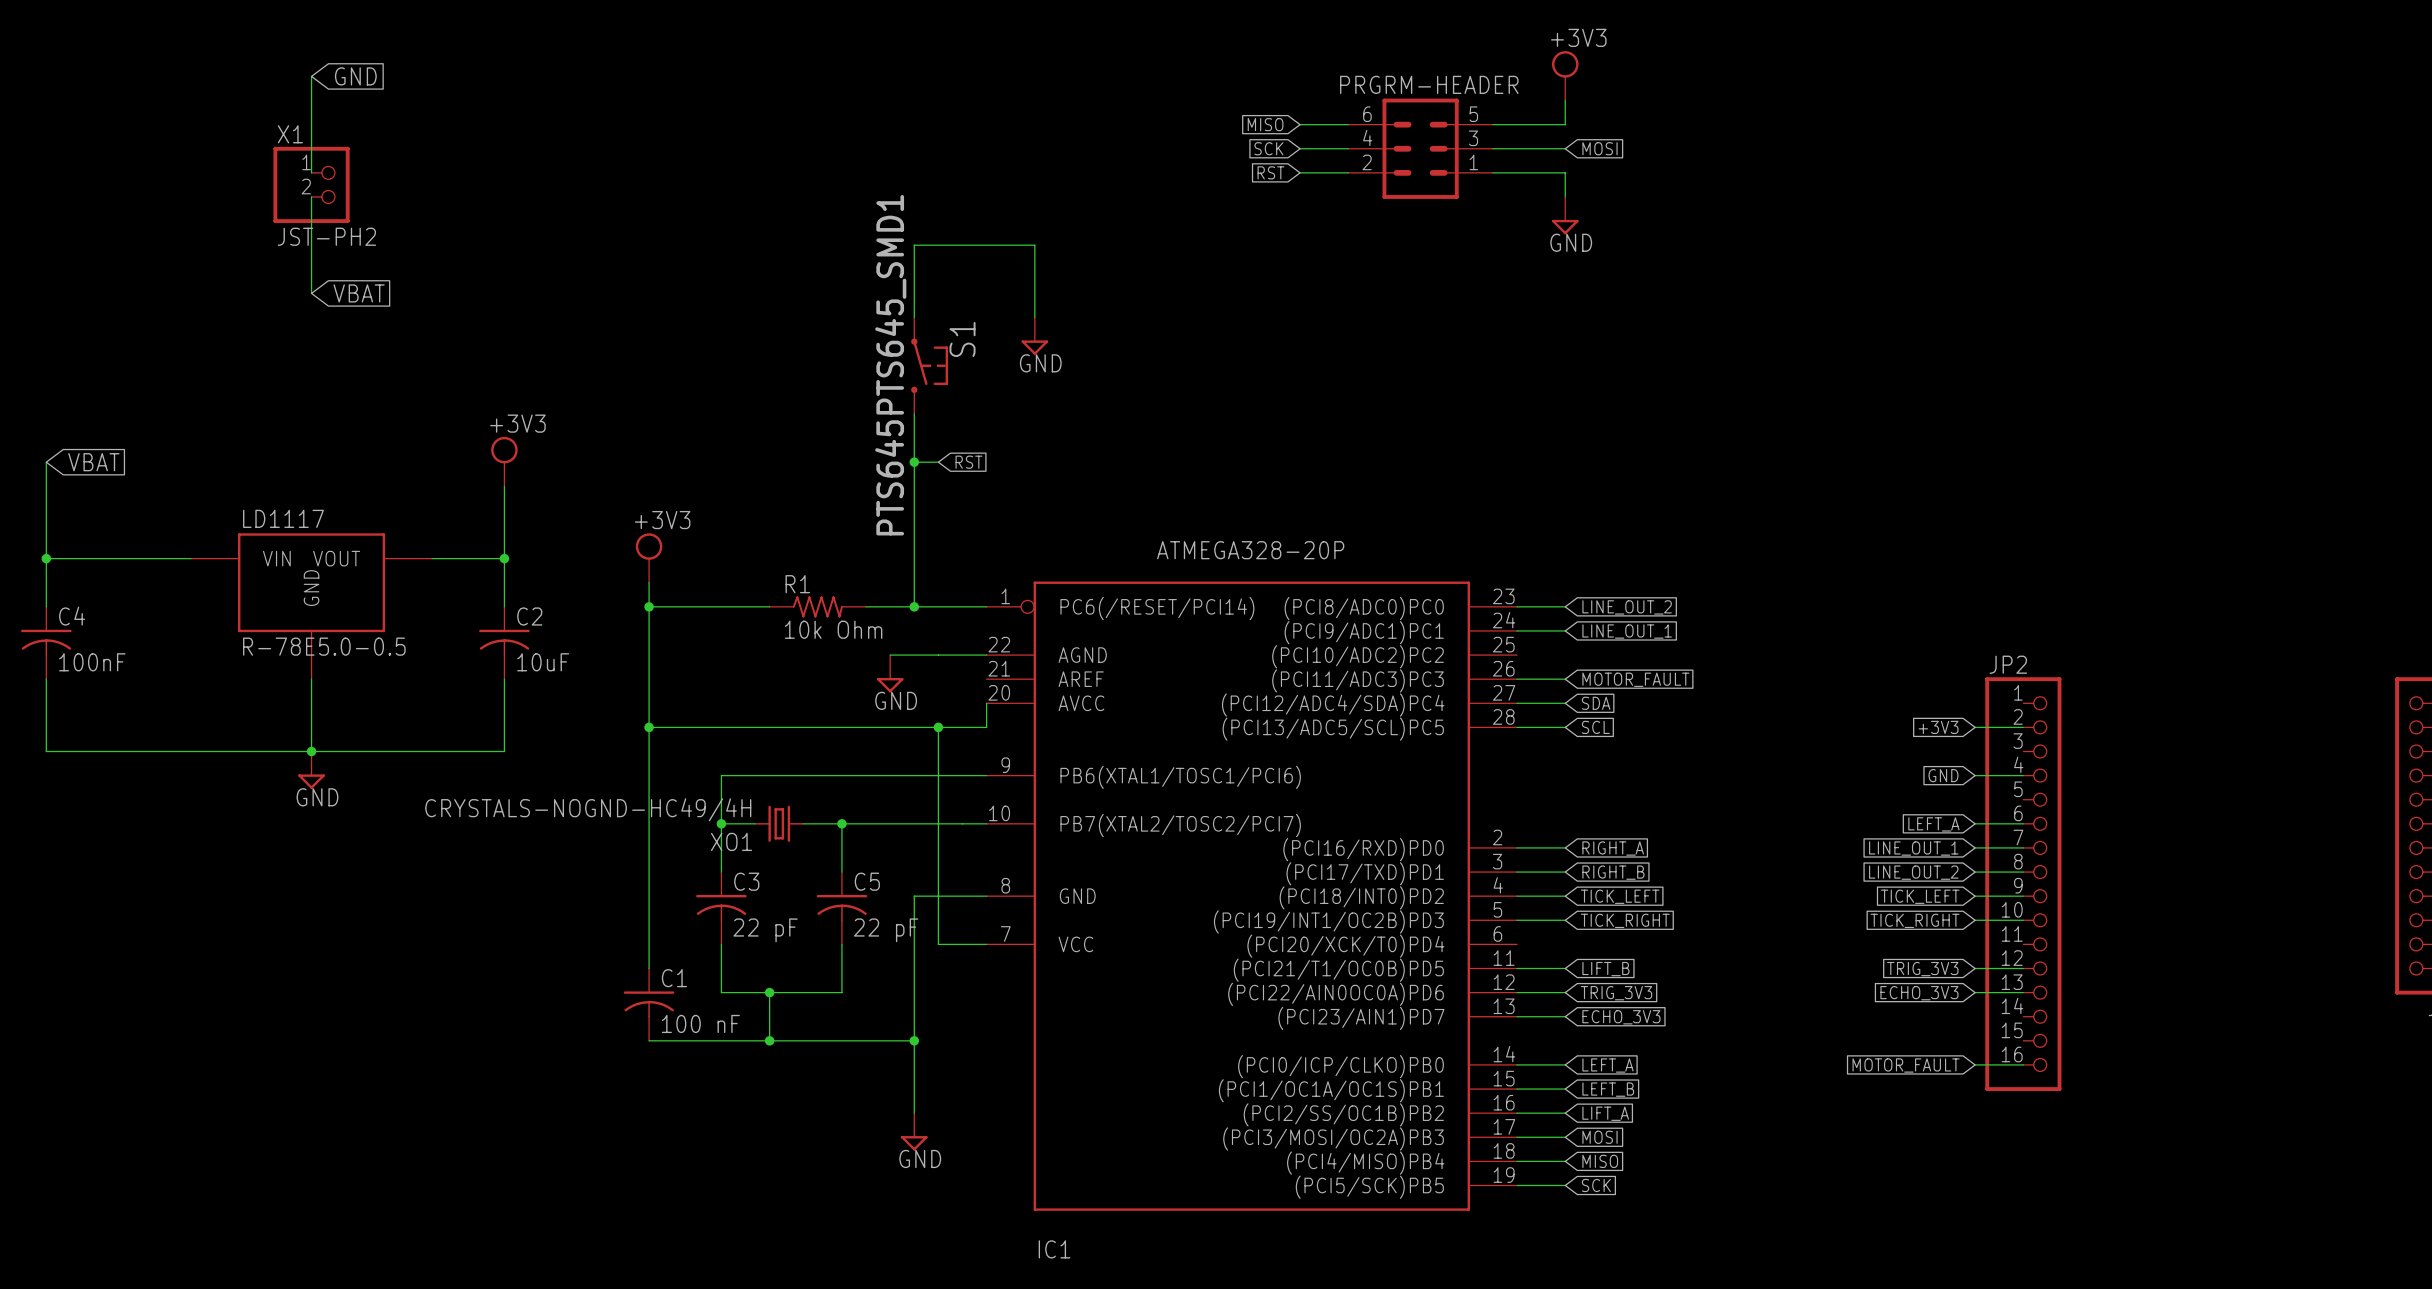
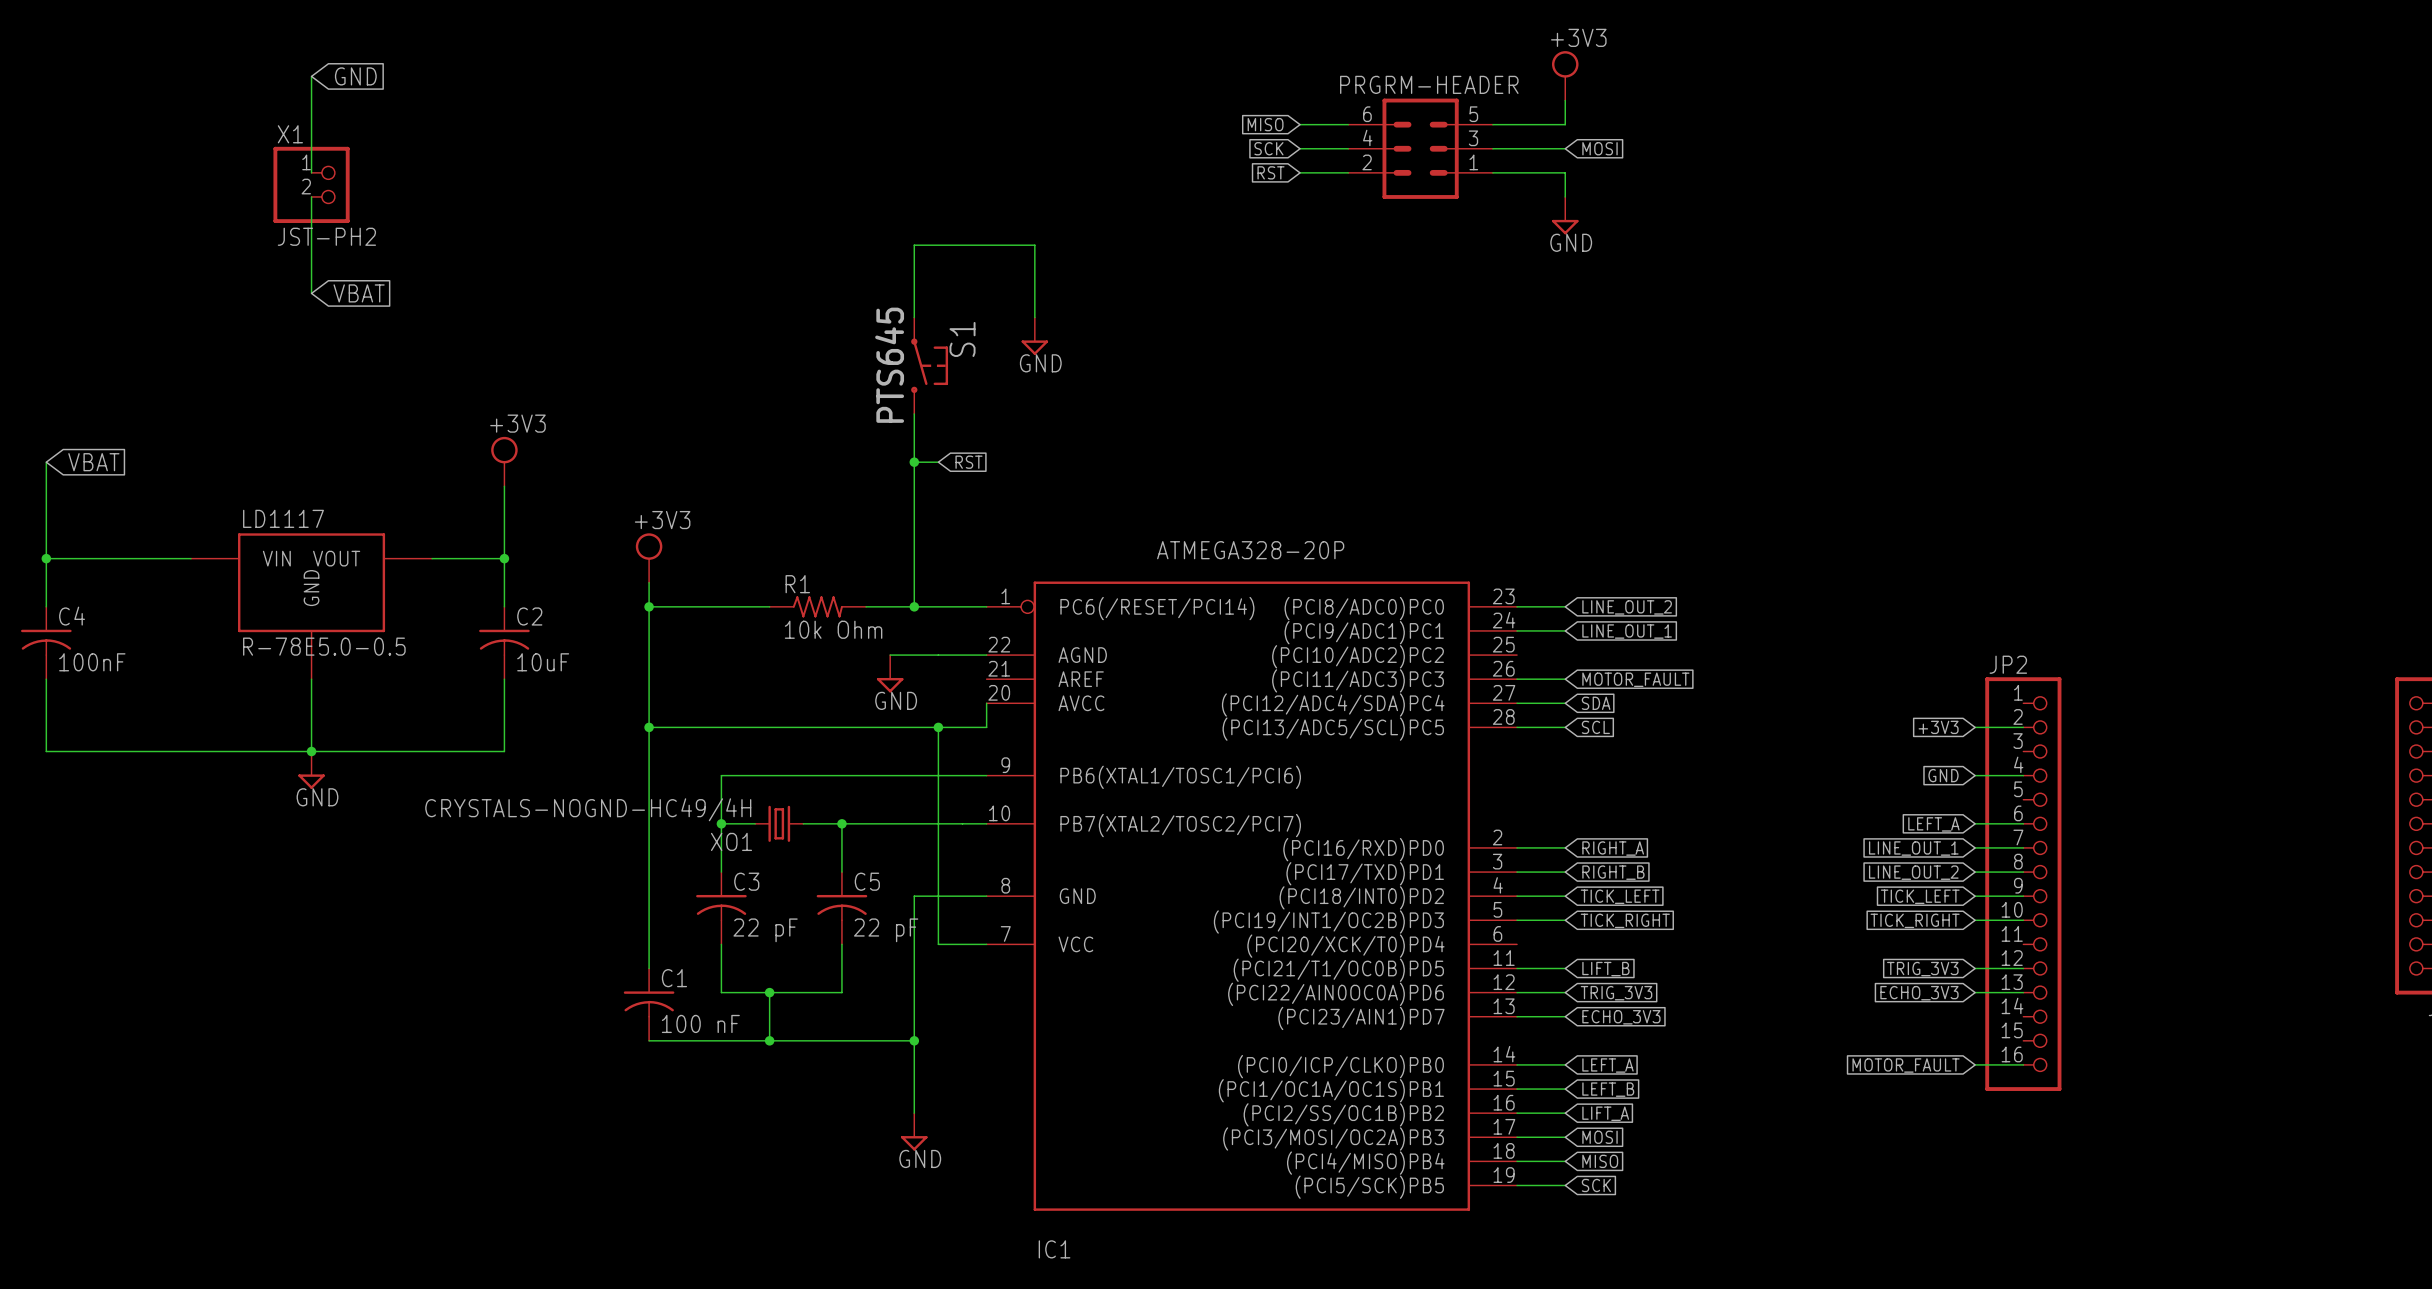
S1 value: PTS645PTS645_SMD1 (890, 365) -> PTS645 (889, 365)

